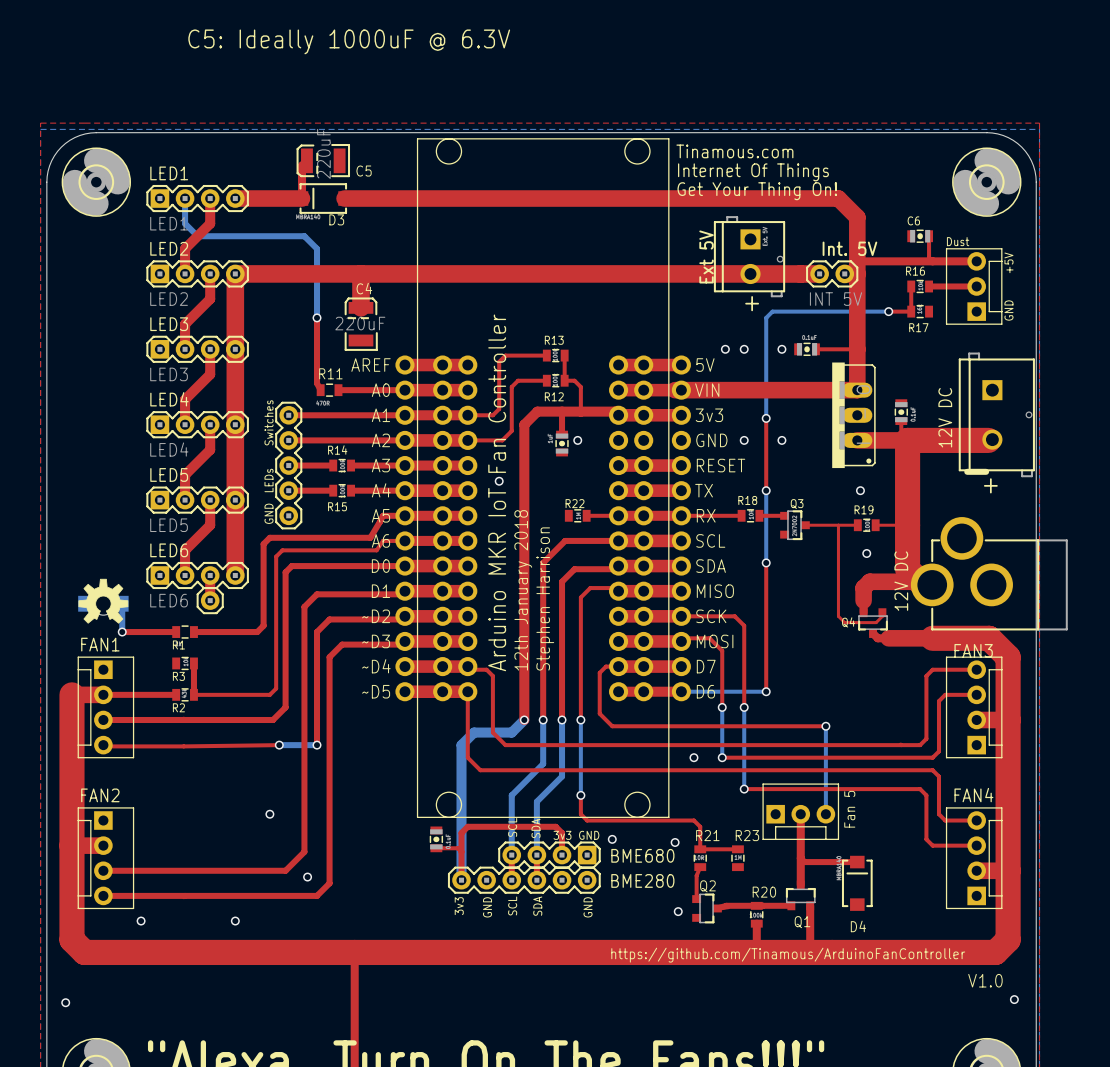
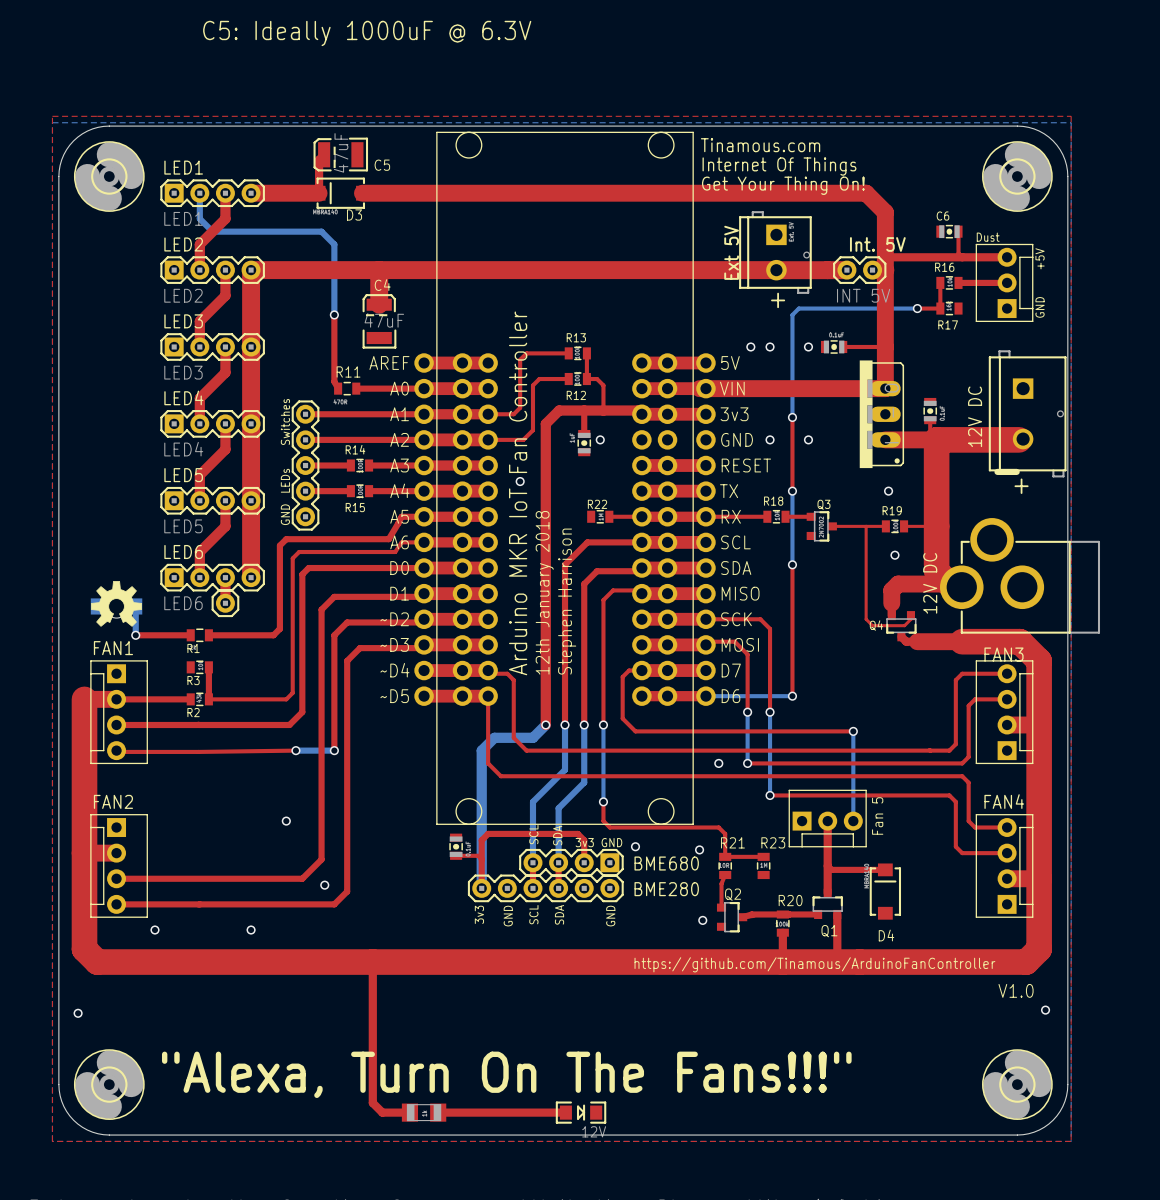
C5 value: 220uF (323, 153) -> 47uF (341, 152)
C4 value: 220uF (360, 323) -> 47uF (384, 320)

